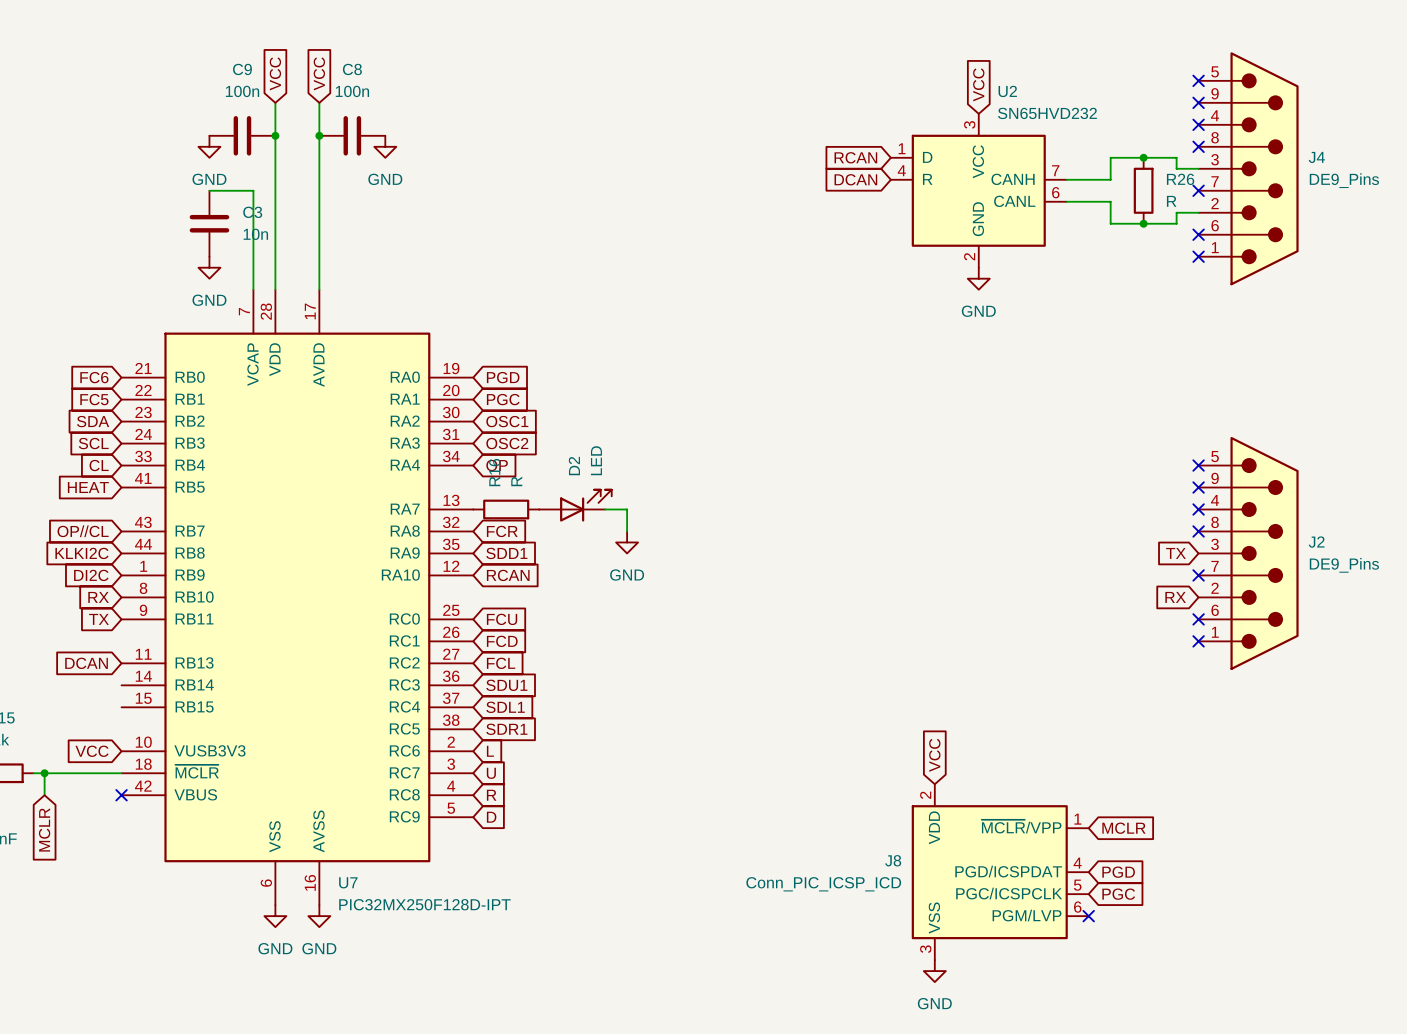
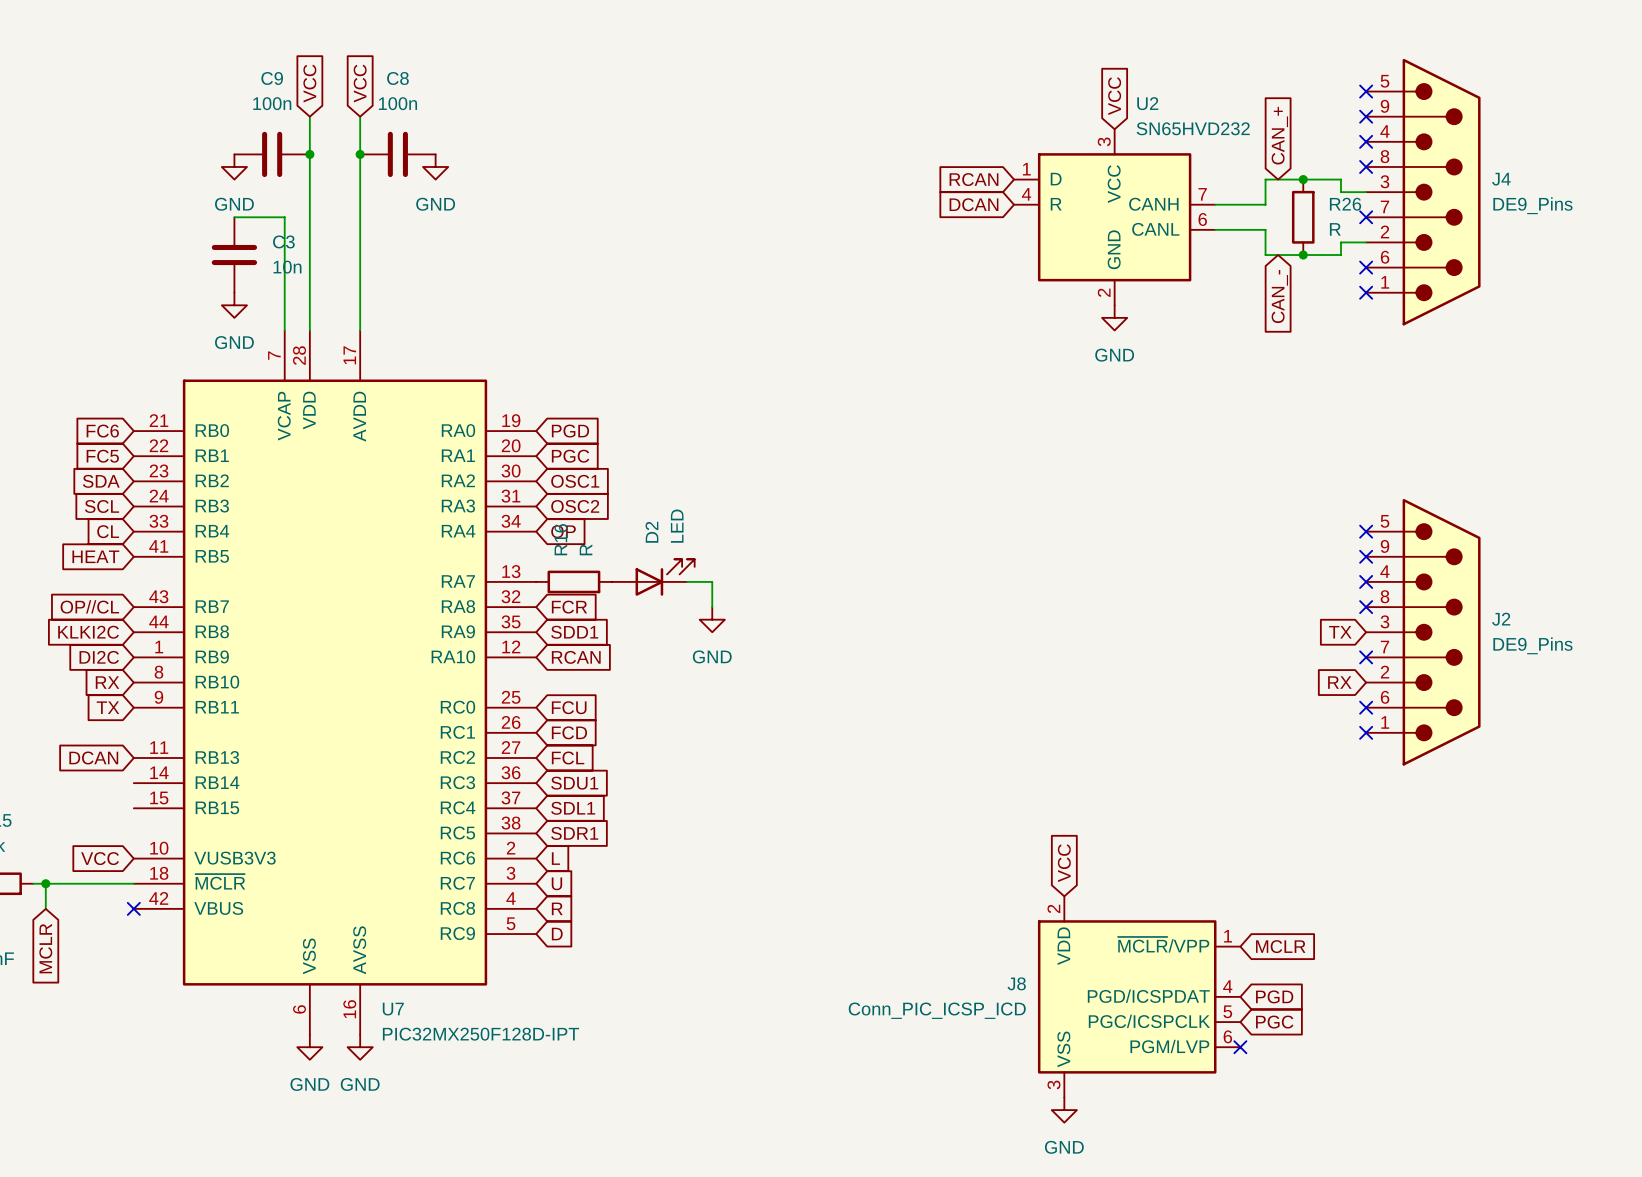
global label: none -> CAN_+ (1279, 135)
global label: none -> CAN_- (1279, 296)

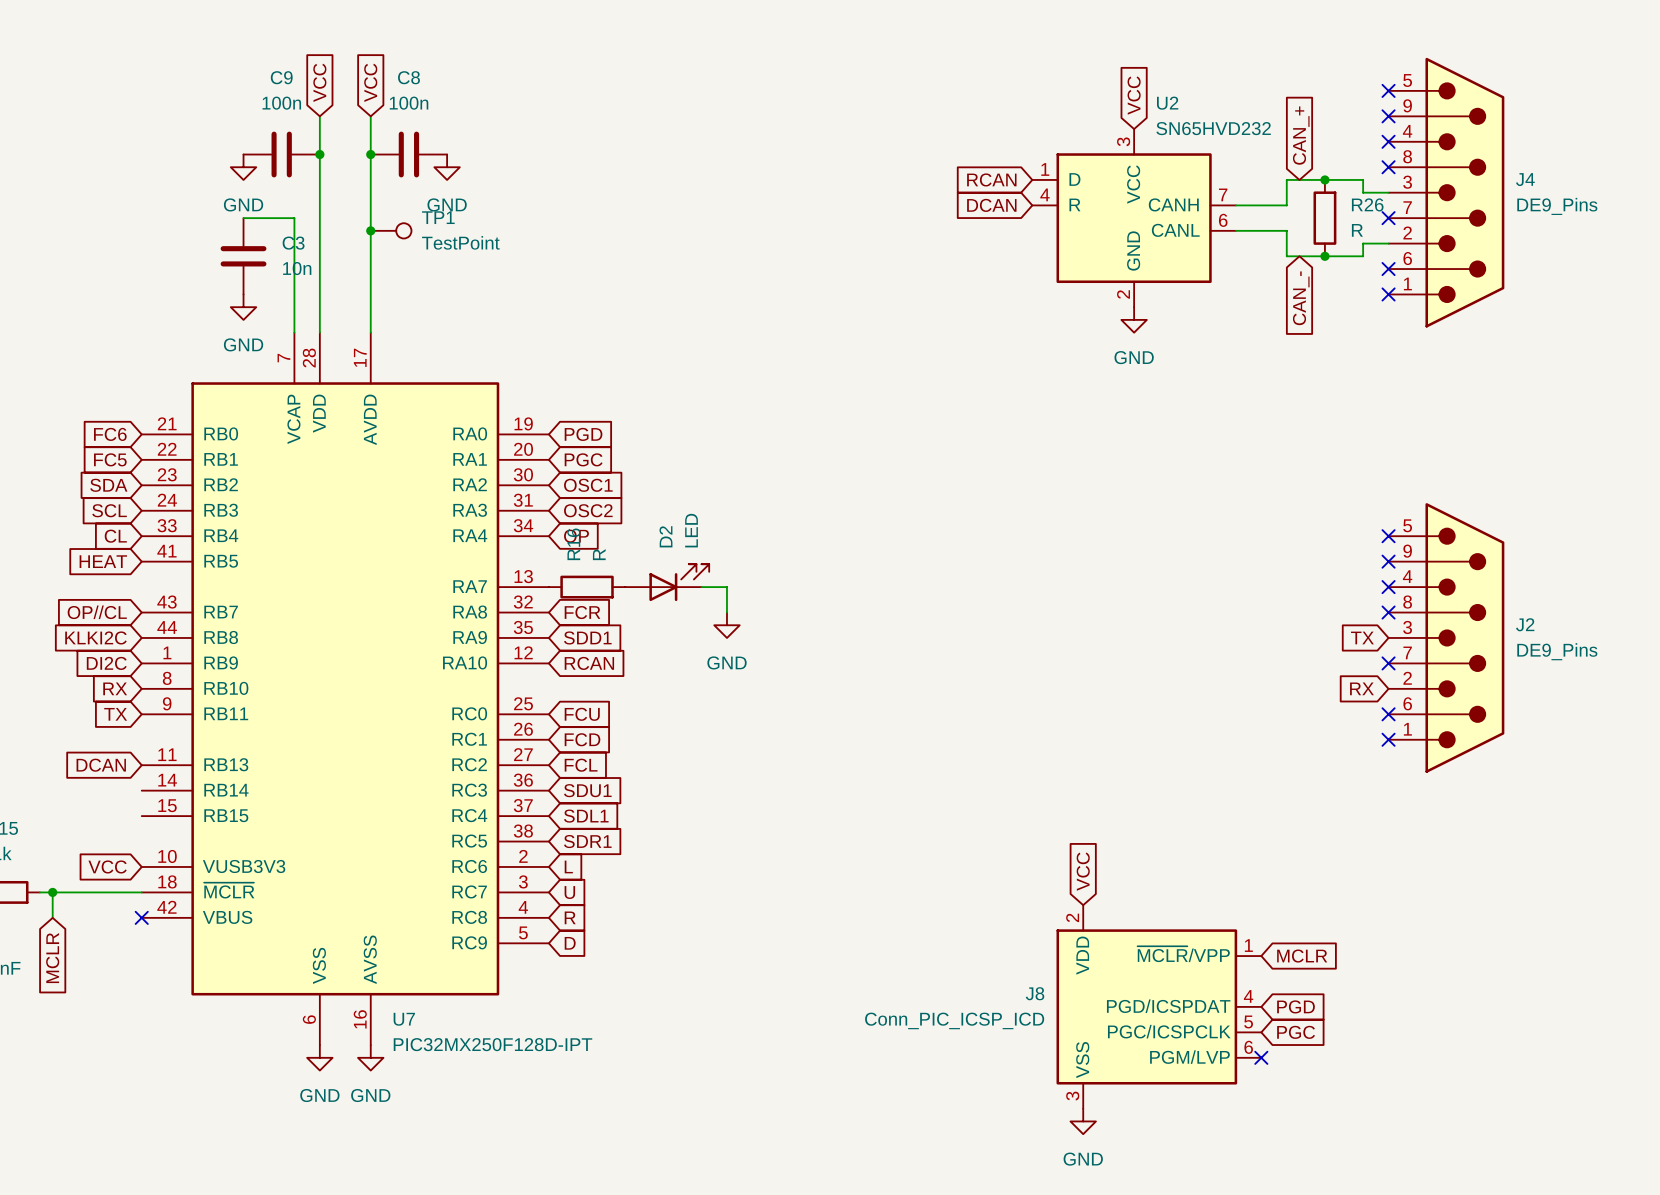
junction: none -> (370, 230)
TP1: none -> TestPoint (391, 230)

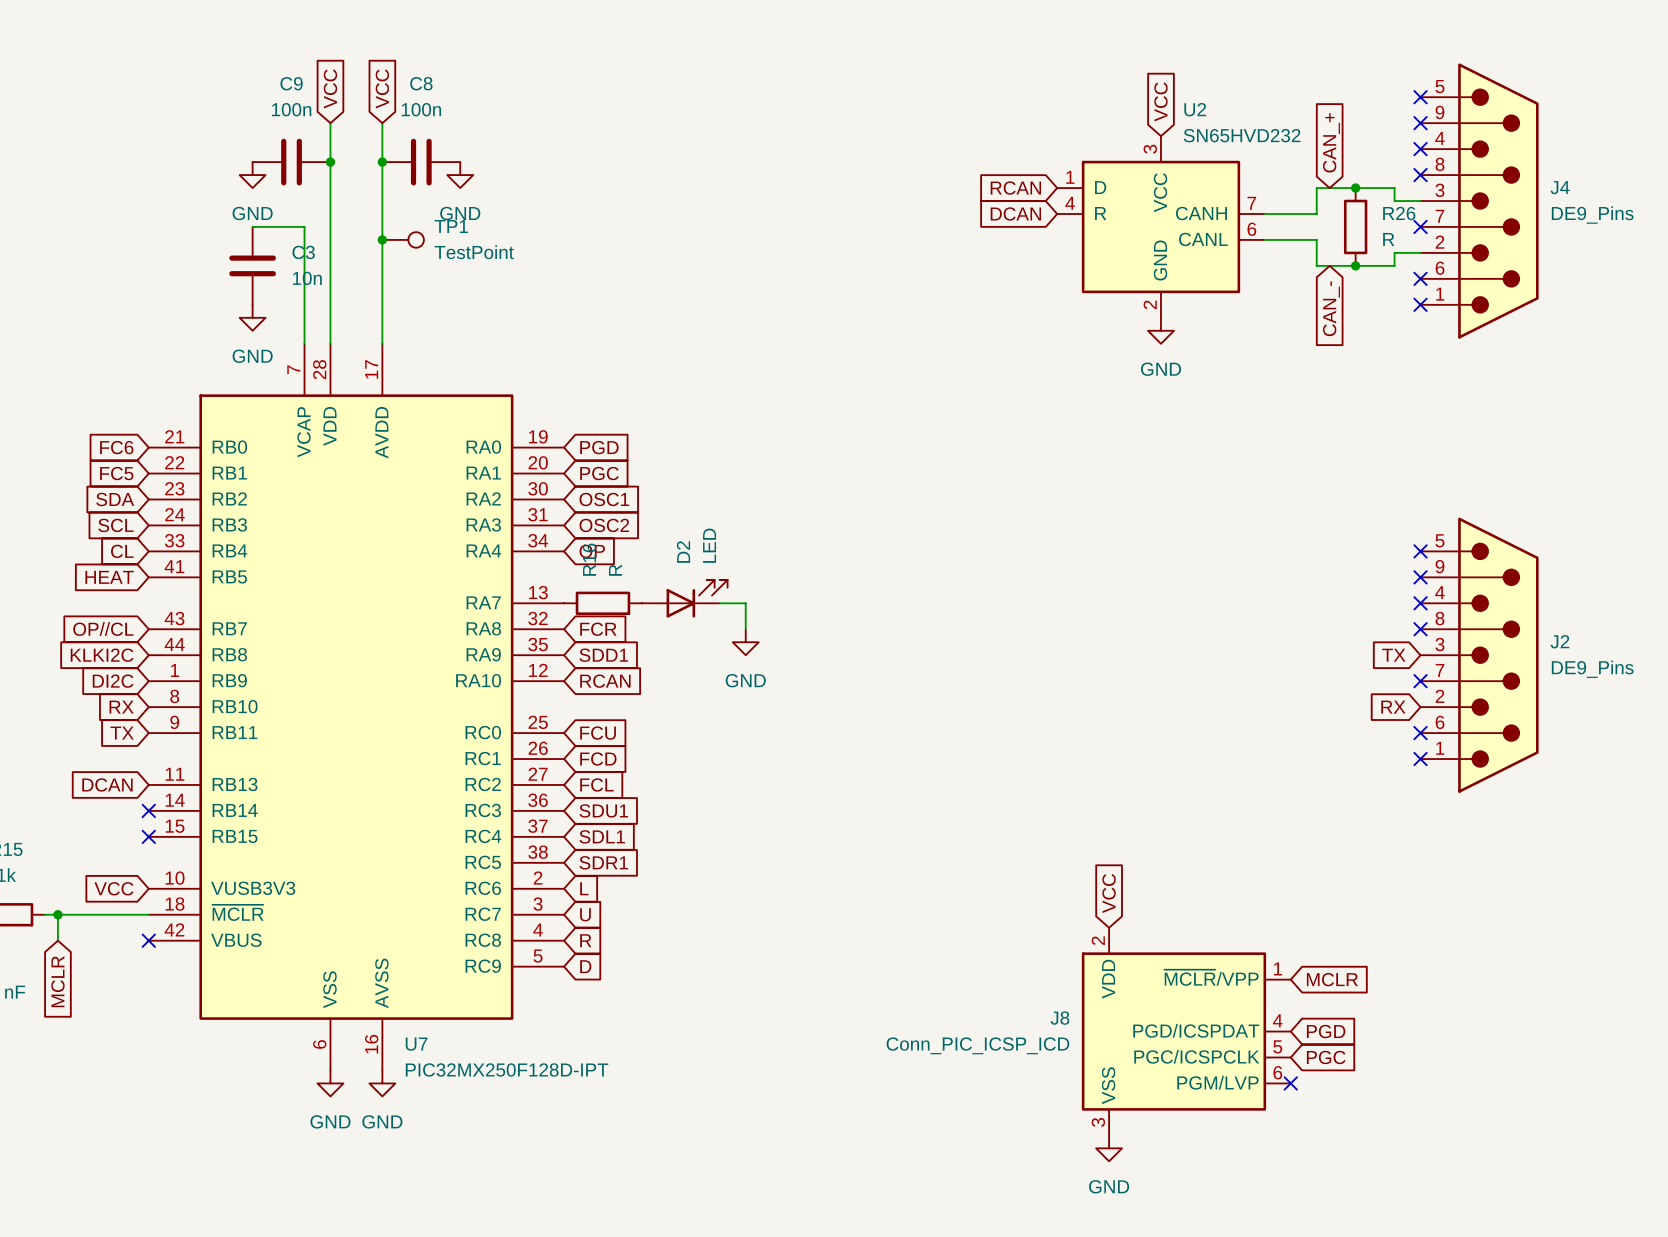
no-connect mark: none -> (148, 810)
no-connect mark: none -> (148, 836)

